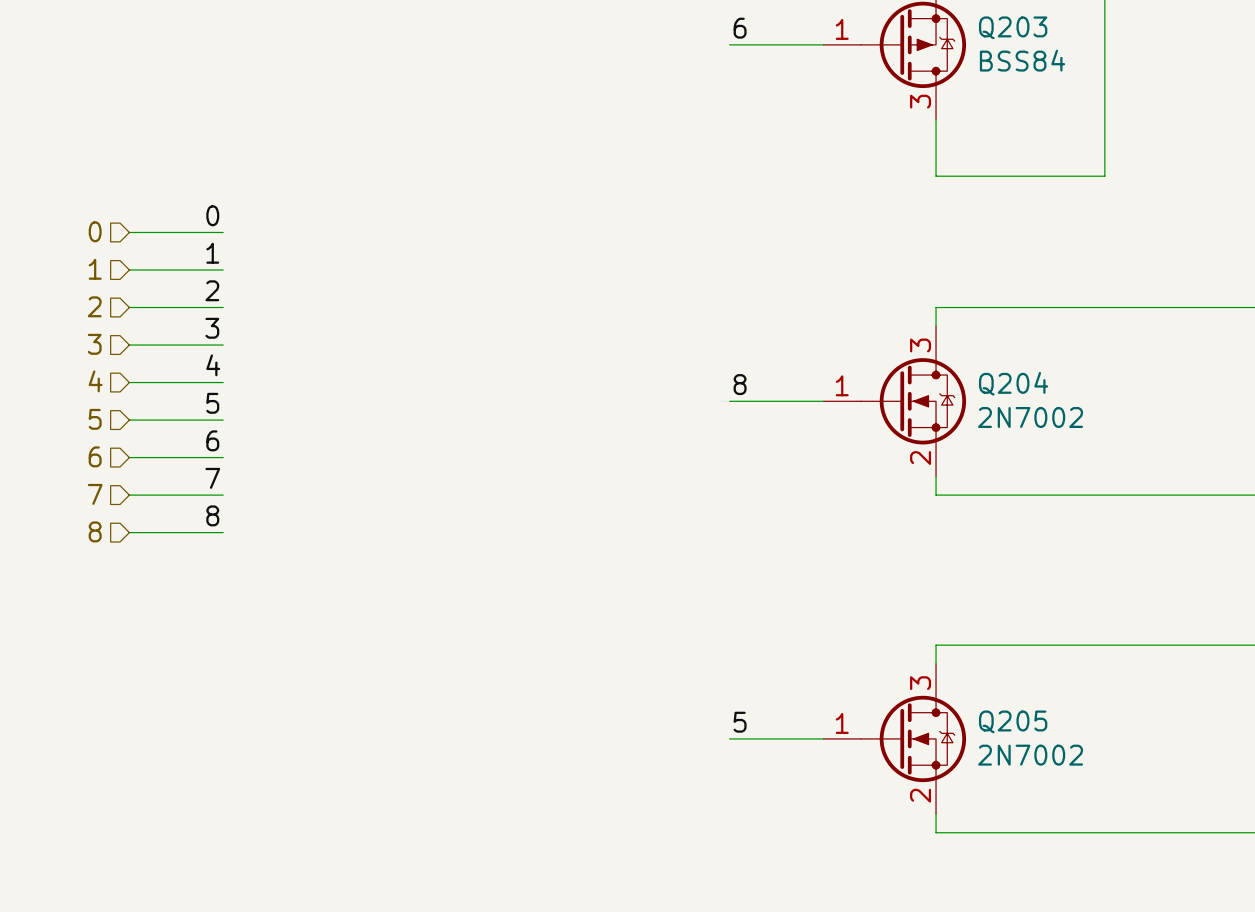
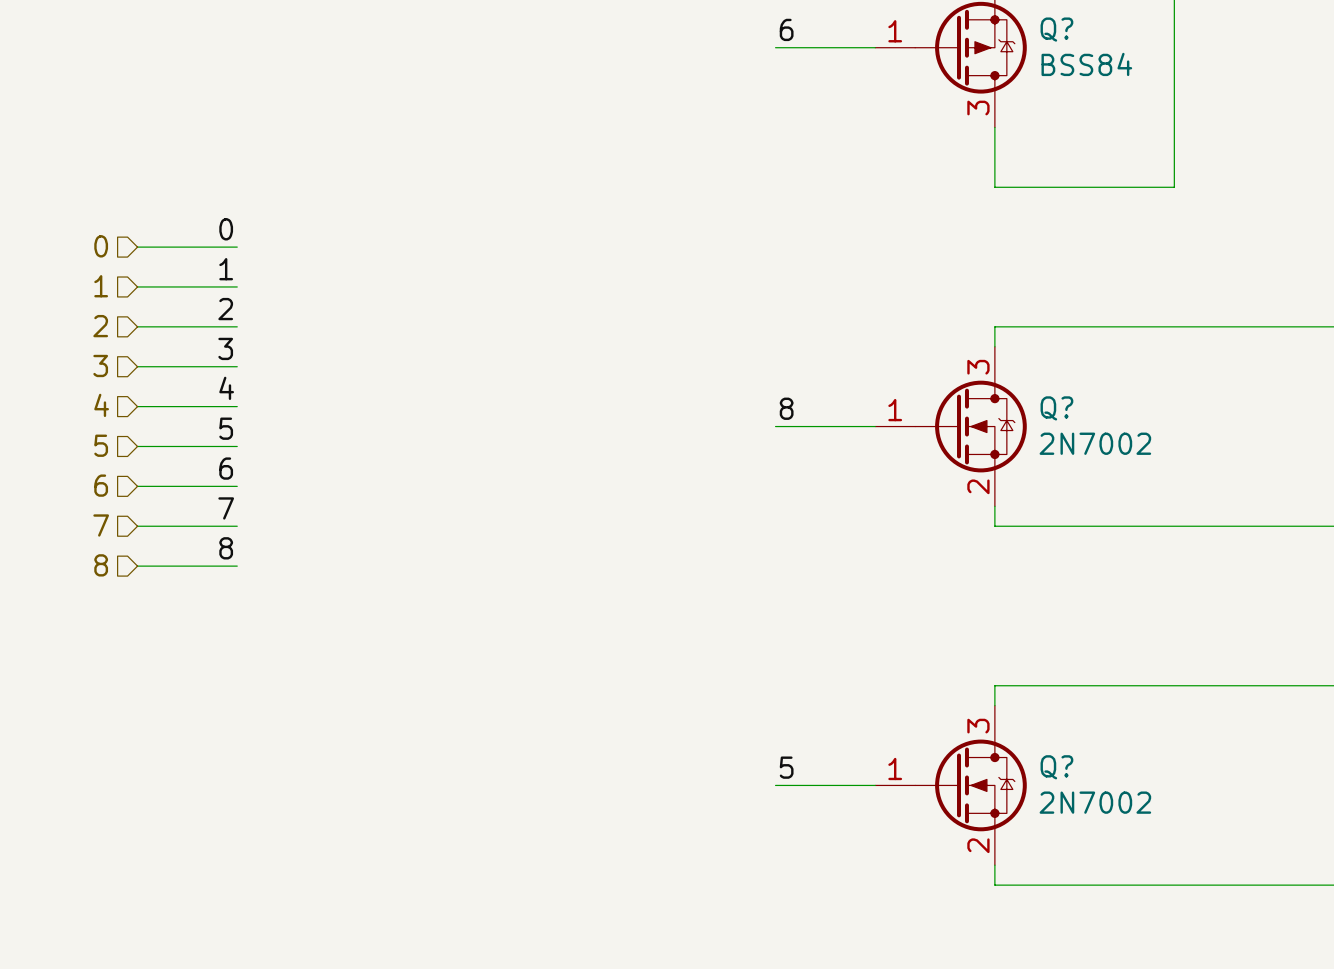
Q203 name: Q203 (1013, 27) -> Q? (1056, 29)
Q204 name: Q204 (1013, 383) -> Q? (1056, 408)
Q205 name: Q205 (1013, 721) -> Q? (1056, 767)

